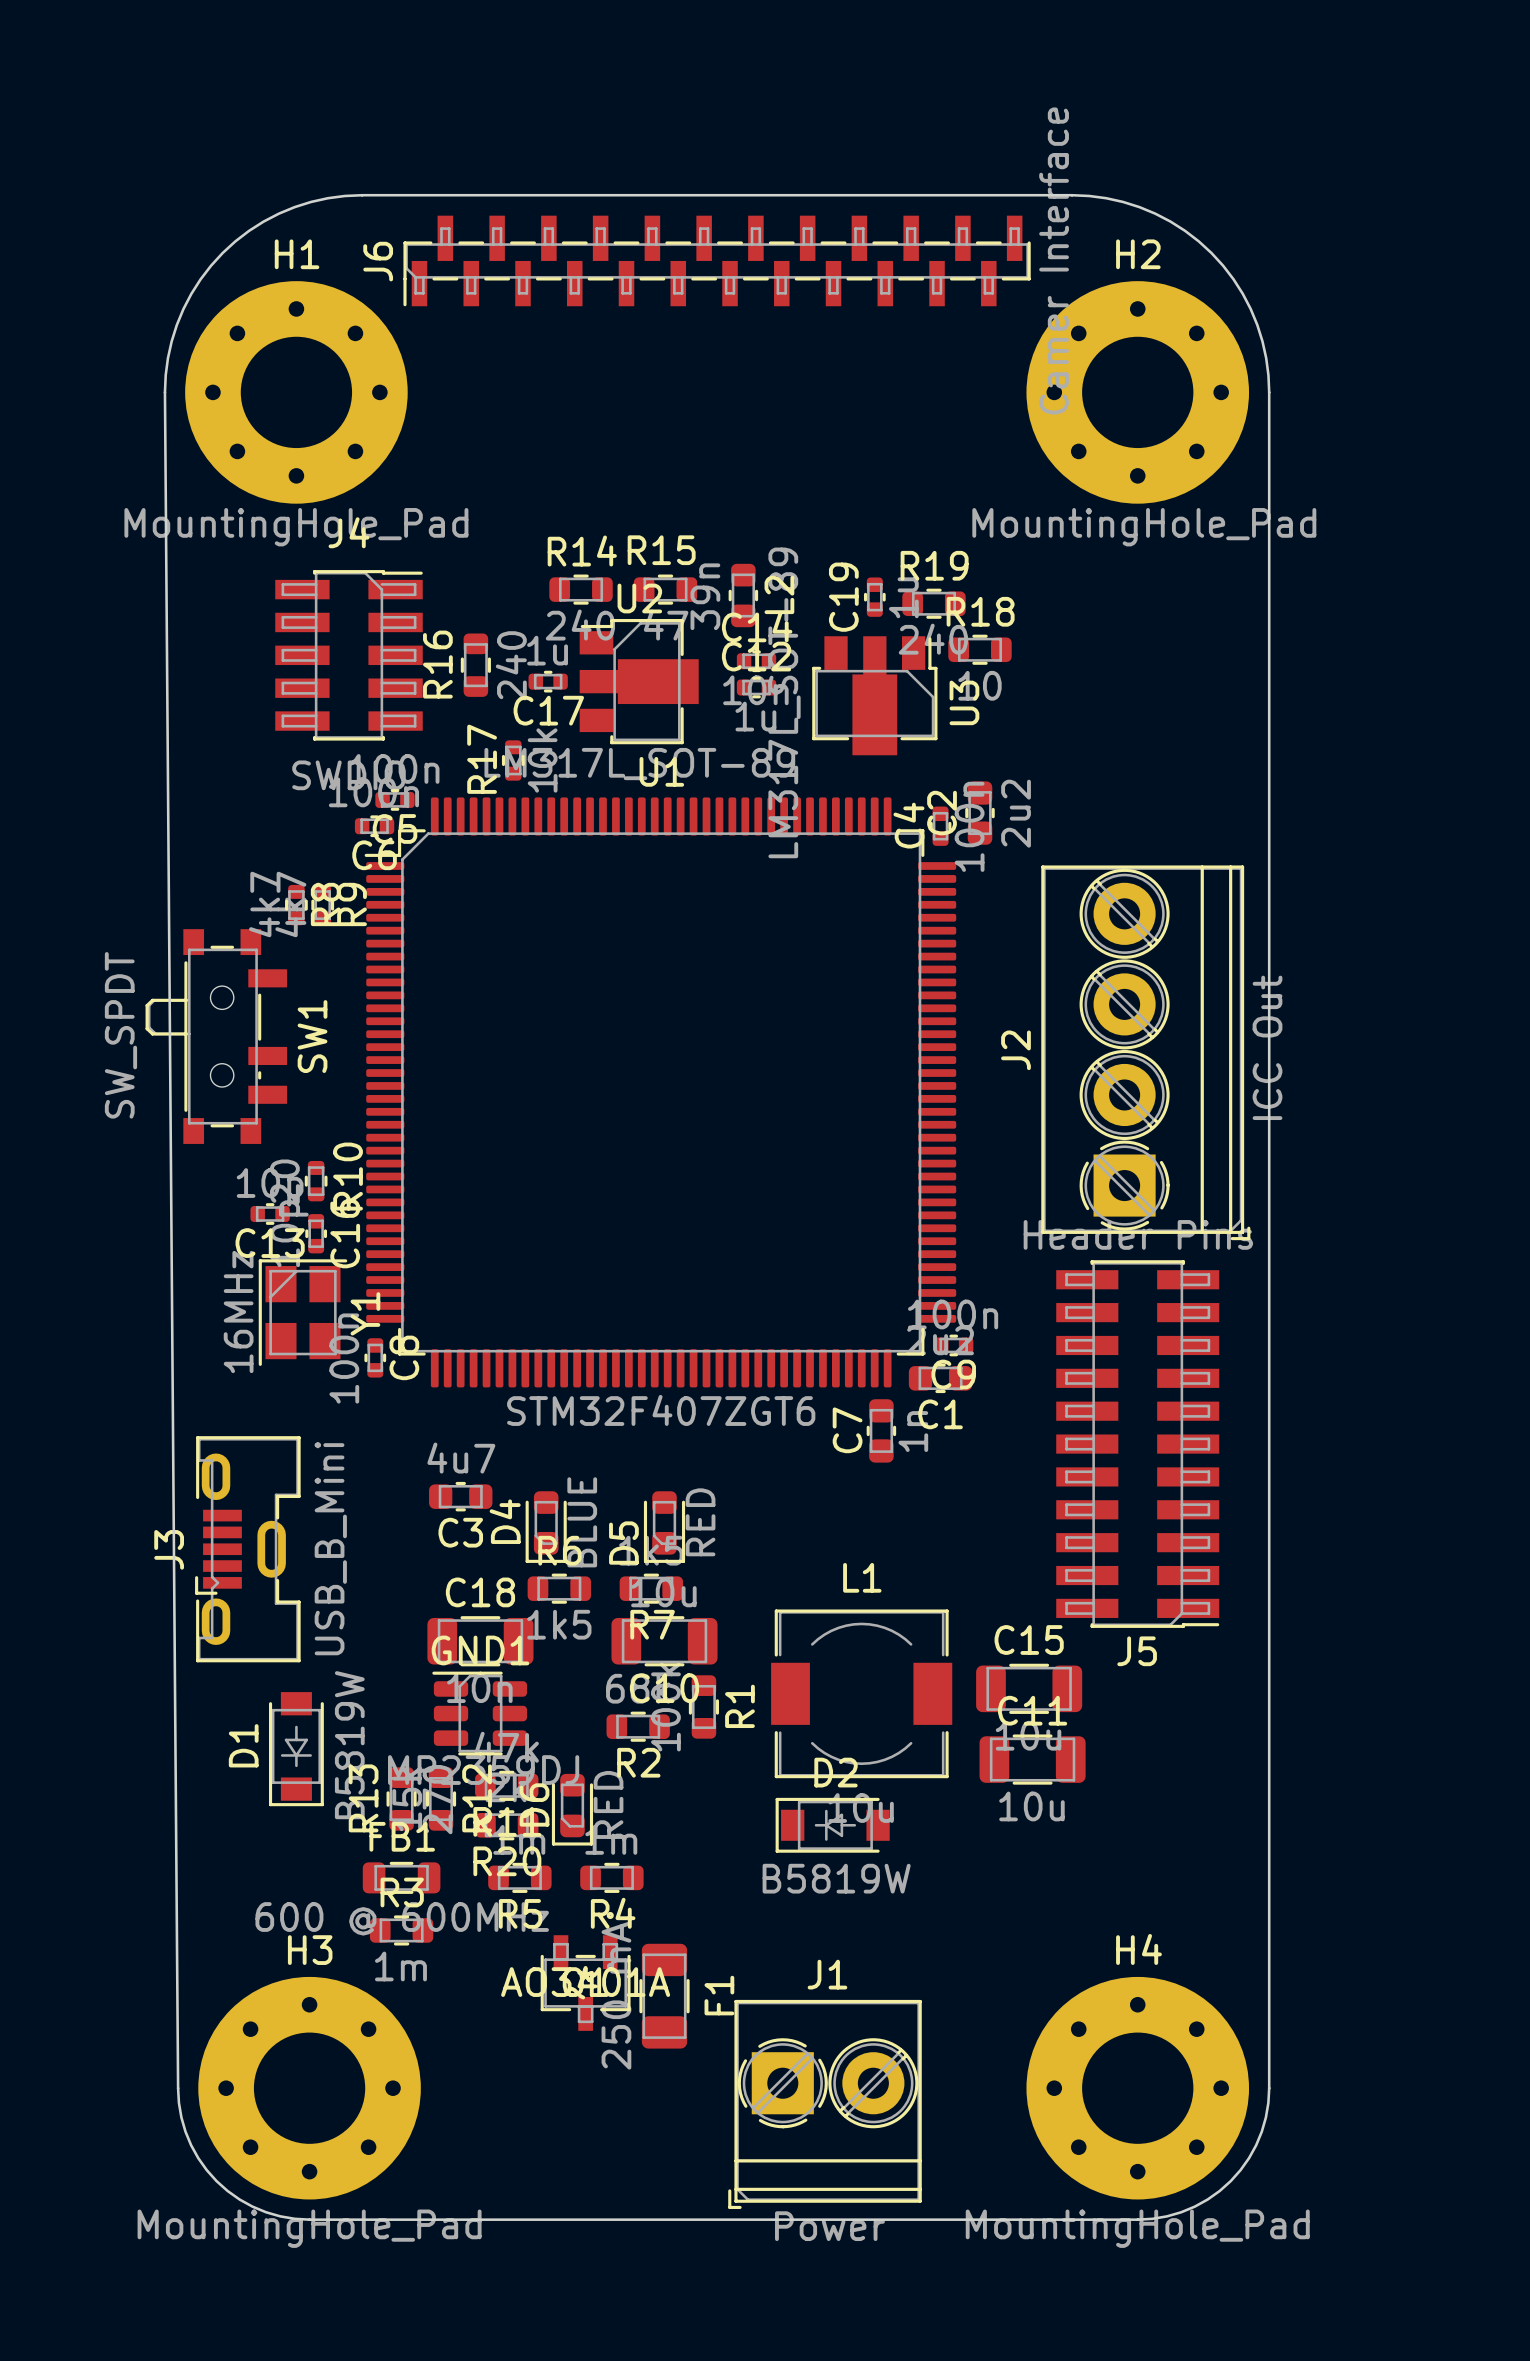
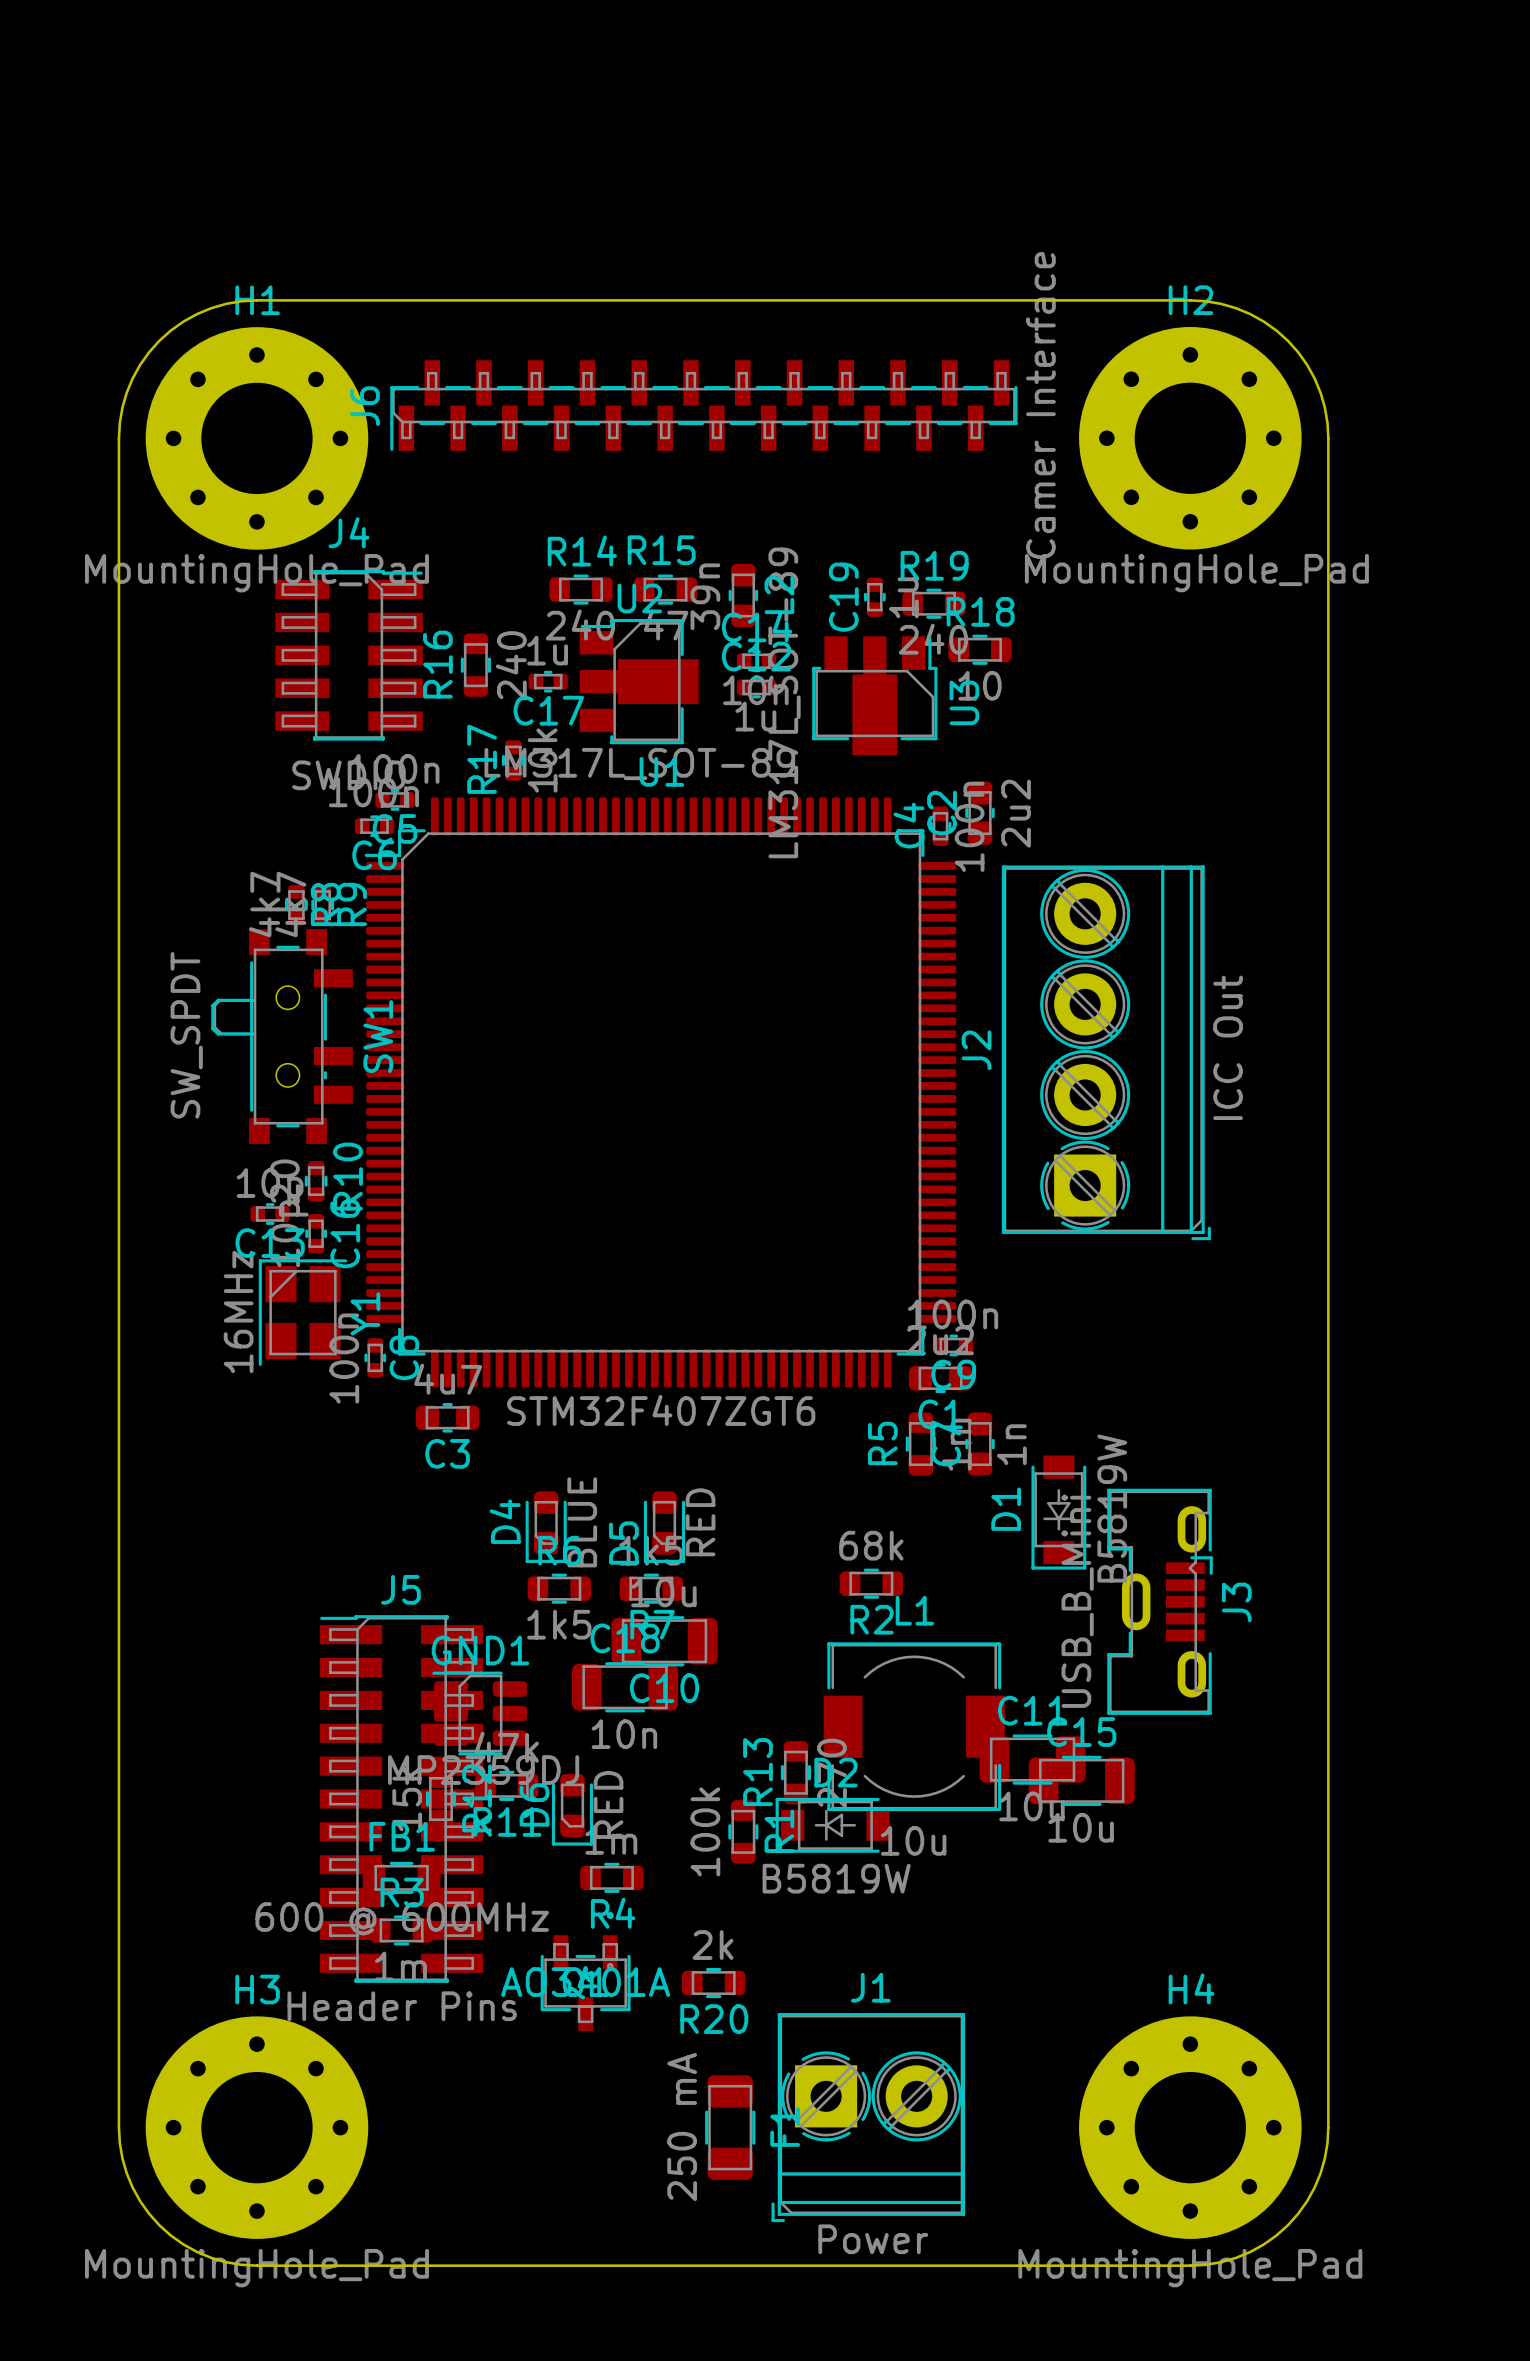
board edge: (362, 195) (1072, 195) (1106, 198) (1155, 213) (1198, 241) (1233, 279) (1257, 324) (1266, 358) (1269, 392) (1269, 2088) (1268, 2102) (1261, 2131) (1256, 2145) (1240, 2170) (1219, 2190) (1194, 2206) (1181, 2212) (1166, 2216) (1137, 2219) (294, 2218) (266, 2212) (252, 2206) (227, 2190) (206, 2170) (191, 2145) (185, 2131) (181, 2117) (178, 2088) (165, 375) (171, 341) (183, 309) (200, 279) (222, 252) (249, 230) (278, 213) (311, 201) (362, 195) -> (256, 300) (226, 303) (197, 314) (170, 330) (159, 340) (149, 352) (132, 378) (122, 407) (119, 422) (118, 2127) (122, 2158) (132, 2187) (140, 2201) (159, 2225) (183, 2244) (211, 2257) (241, 2264) (1190, 2265) (1221, 2262) (1250, 2252) (1276, 2235) (1298, 2213) (1307, 2201) (1320, 2173) (1324, 2158) (1328, 2127) (1328, 438) (1324, 407) (1314, 378) (1298, 352) (1276, 330) (1250, 314) (1221, 303) (1205, 301) (256, 300)
J6 position: (717, 260) -> (703, 405)
H1 position: (296, 392) -> (256, 438)
H2 position: (1137, 392) -> (1190, 438)
SW1 position: (216, 1036) -> (282, 1036)
J2 position: (1145, 1052) -> (1106, 1052)
C7 position: (881, 1430) -> (979, 1444)
J5 rotation: 0° (1137, 1444) -> 180° (401, 1799)
J5 position: (1137, 1444) -> (401, 1799)
C3 position: (460, 1496) -> (447, 1417)
J3 rotation: 0° (247, 1549) -> 180° (1160, 1601)
J3 position: (247, 1549) -> (1160, 1601)
C18 position: (480, 1641) -> (625, 1687)
C15 position: (1029, 1688) -> (1081, 1780)
L1 position: (861, 1693) -> (914, 1726)
R1 position: (703, 1706) -> (743, 1831)
R2 position: (638, 1726) -> (871, 1583)
D1 position: (296, 1749) -> (1058, 1512)
R13 position: (401, 1799) -> (795, 1772)
R20 position: (506, 1825) -> (713, 1983)
R5 rotation: 0° (519, 1877) -> 90° clockwise (920, 1444)
R5 position: (519, 1877) -> (920, 1444)
F1 position: (664, 1996) -> (730, 2127)
H3 position: (309, 2088) -> (256, 2127)
H4 position: (1137, 2088) -> (1190, 2127)
J1 position: (824, 2104) -> (868, 2117)

